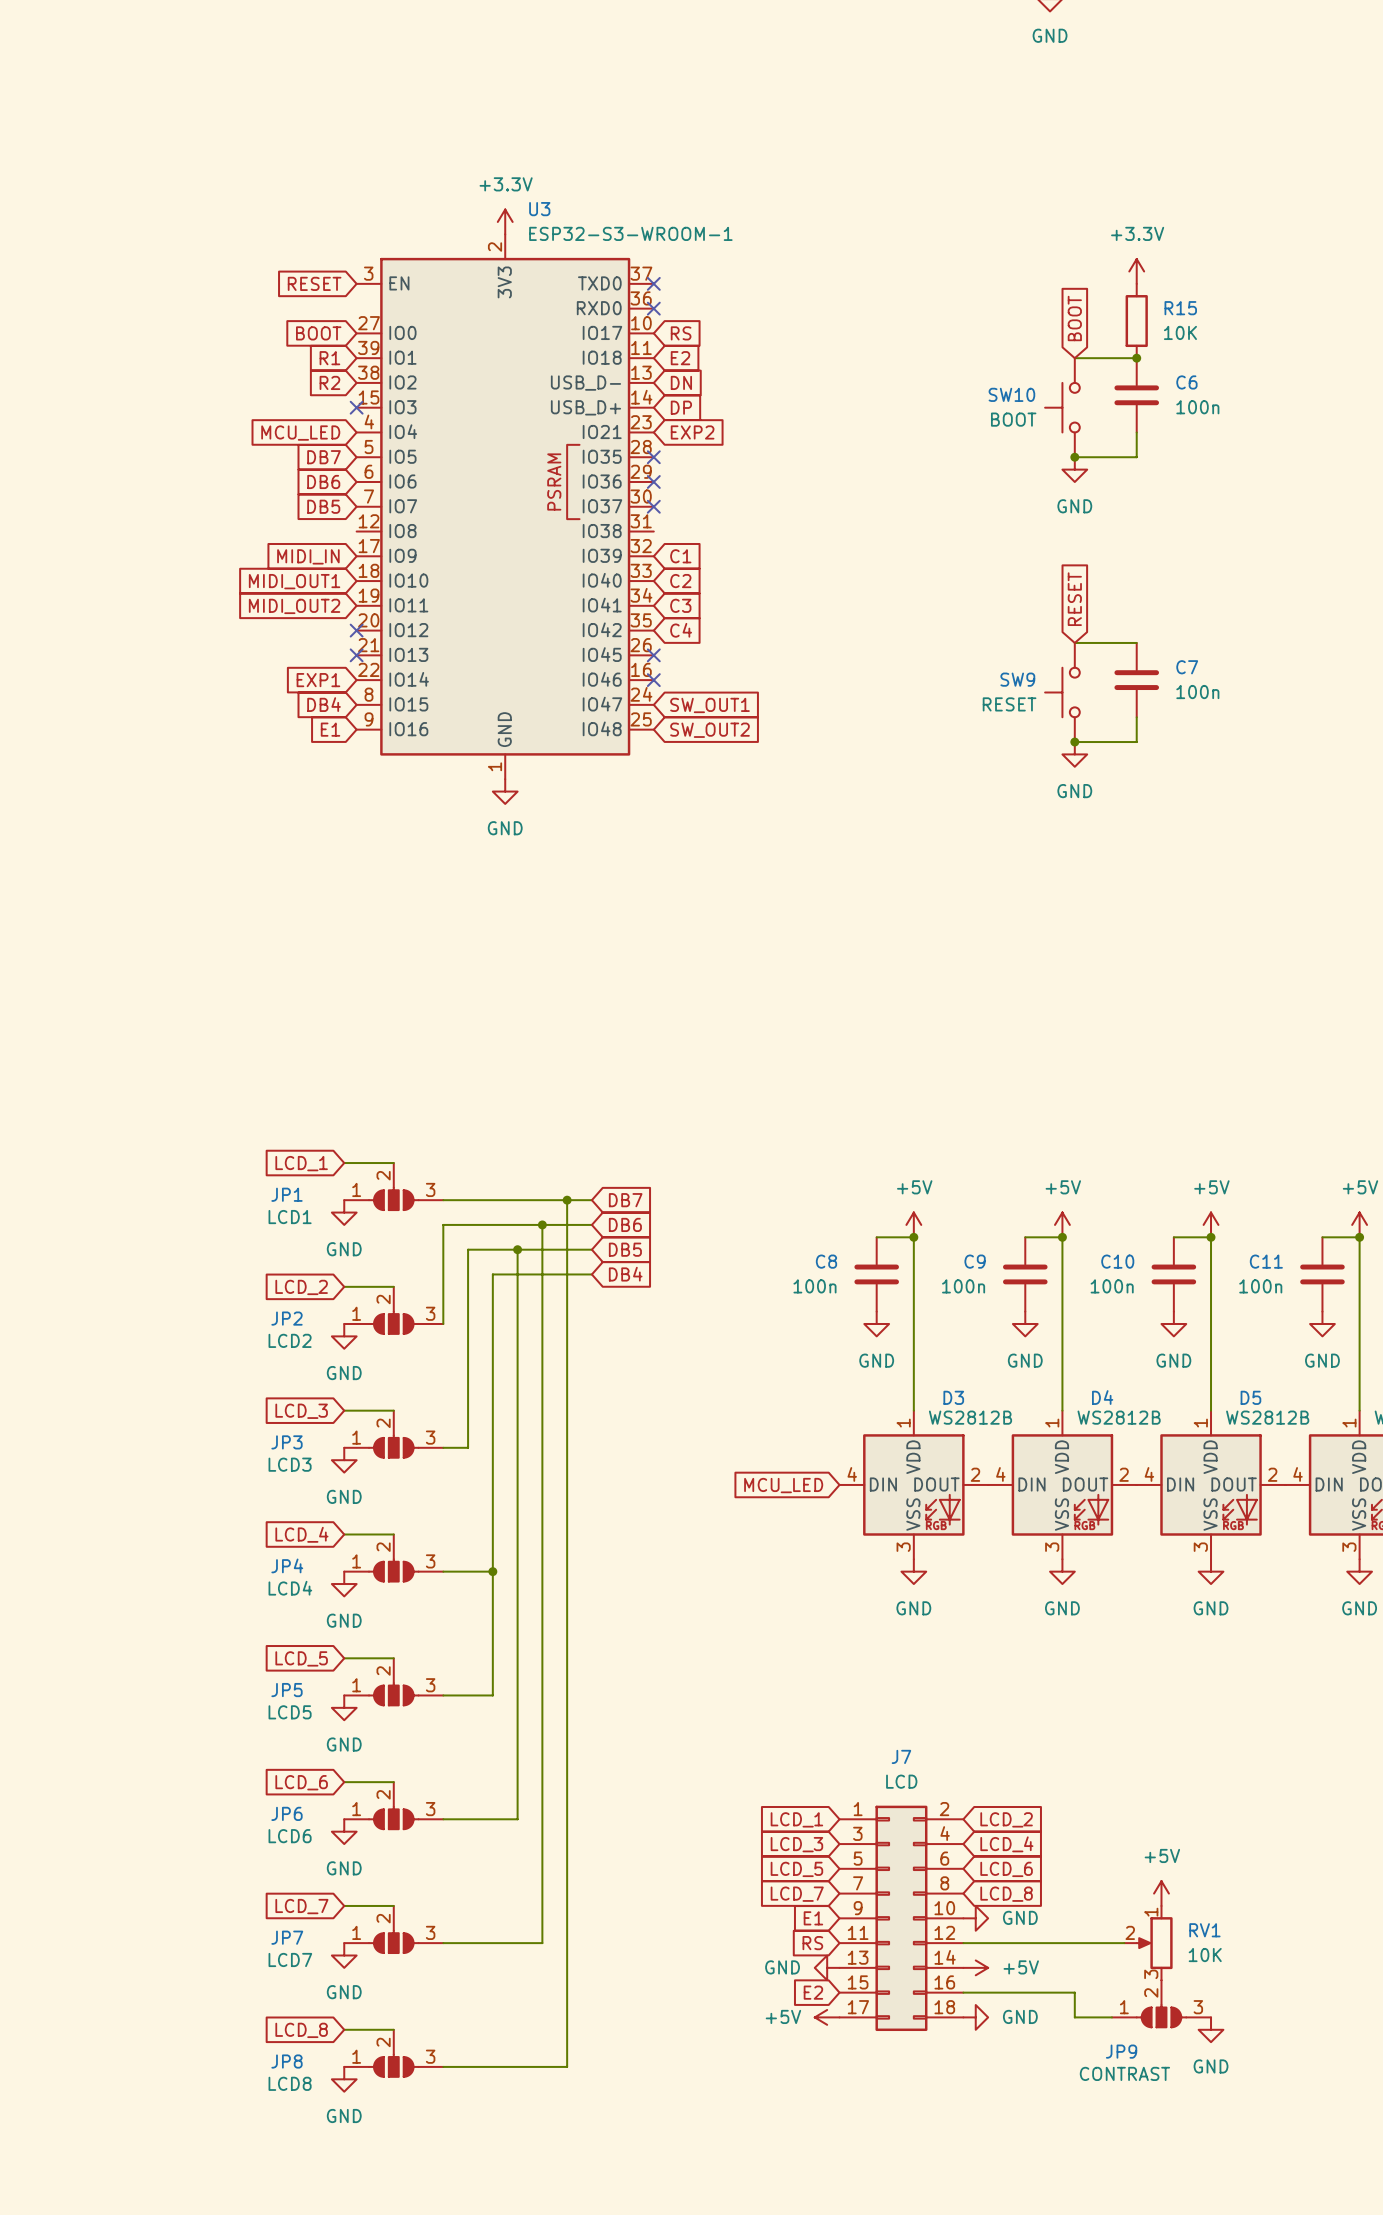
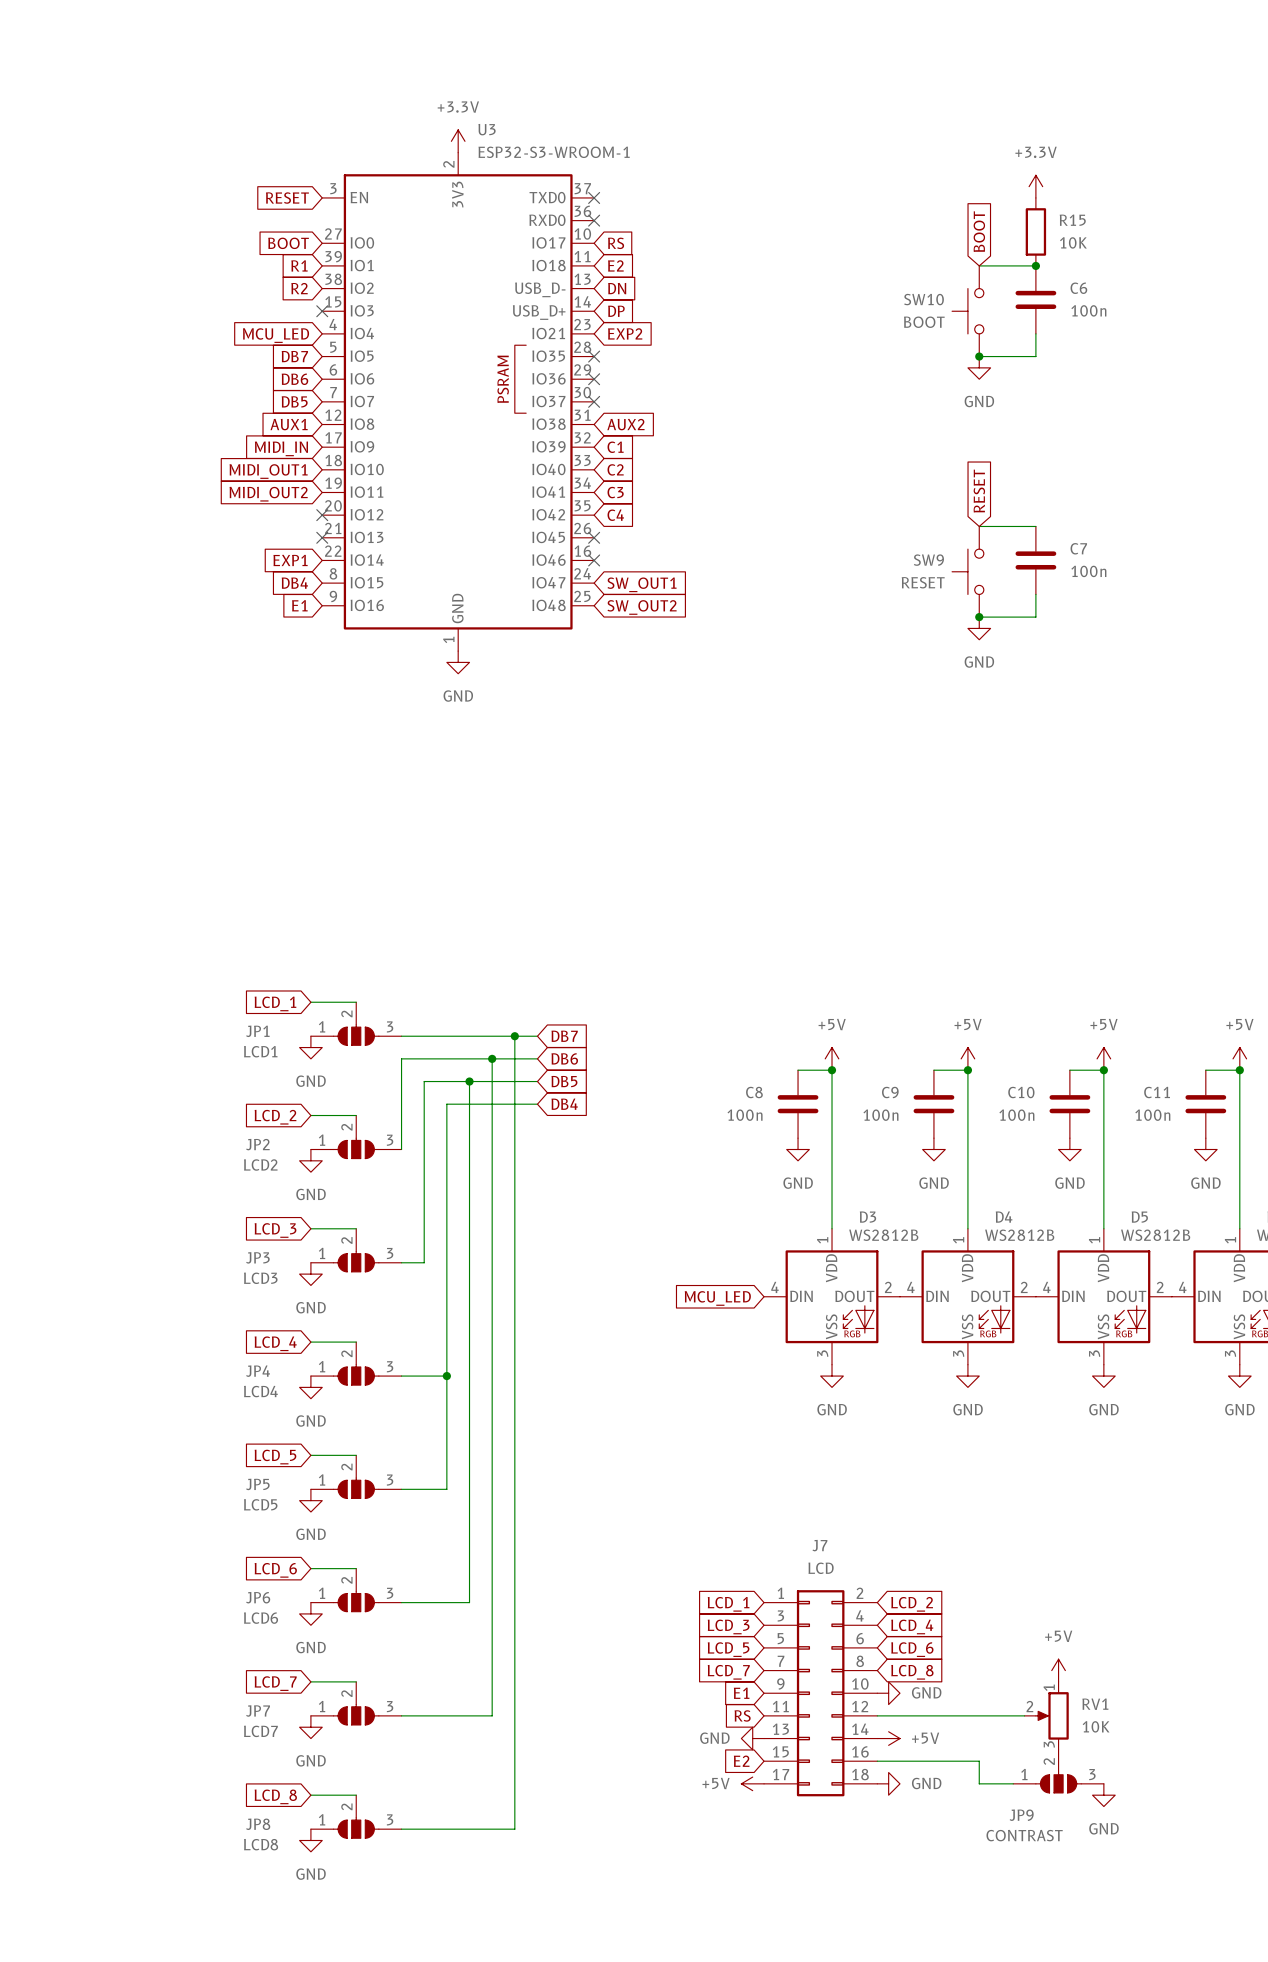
global label: none -> AUX1 (289, 424)
global label: none -> AUX2 (625, 424)

